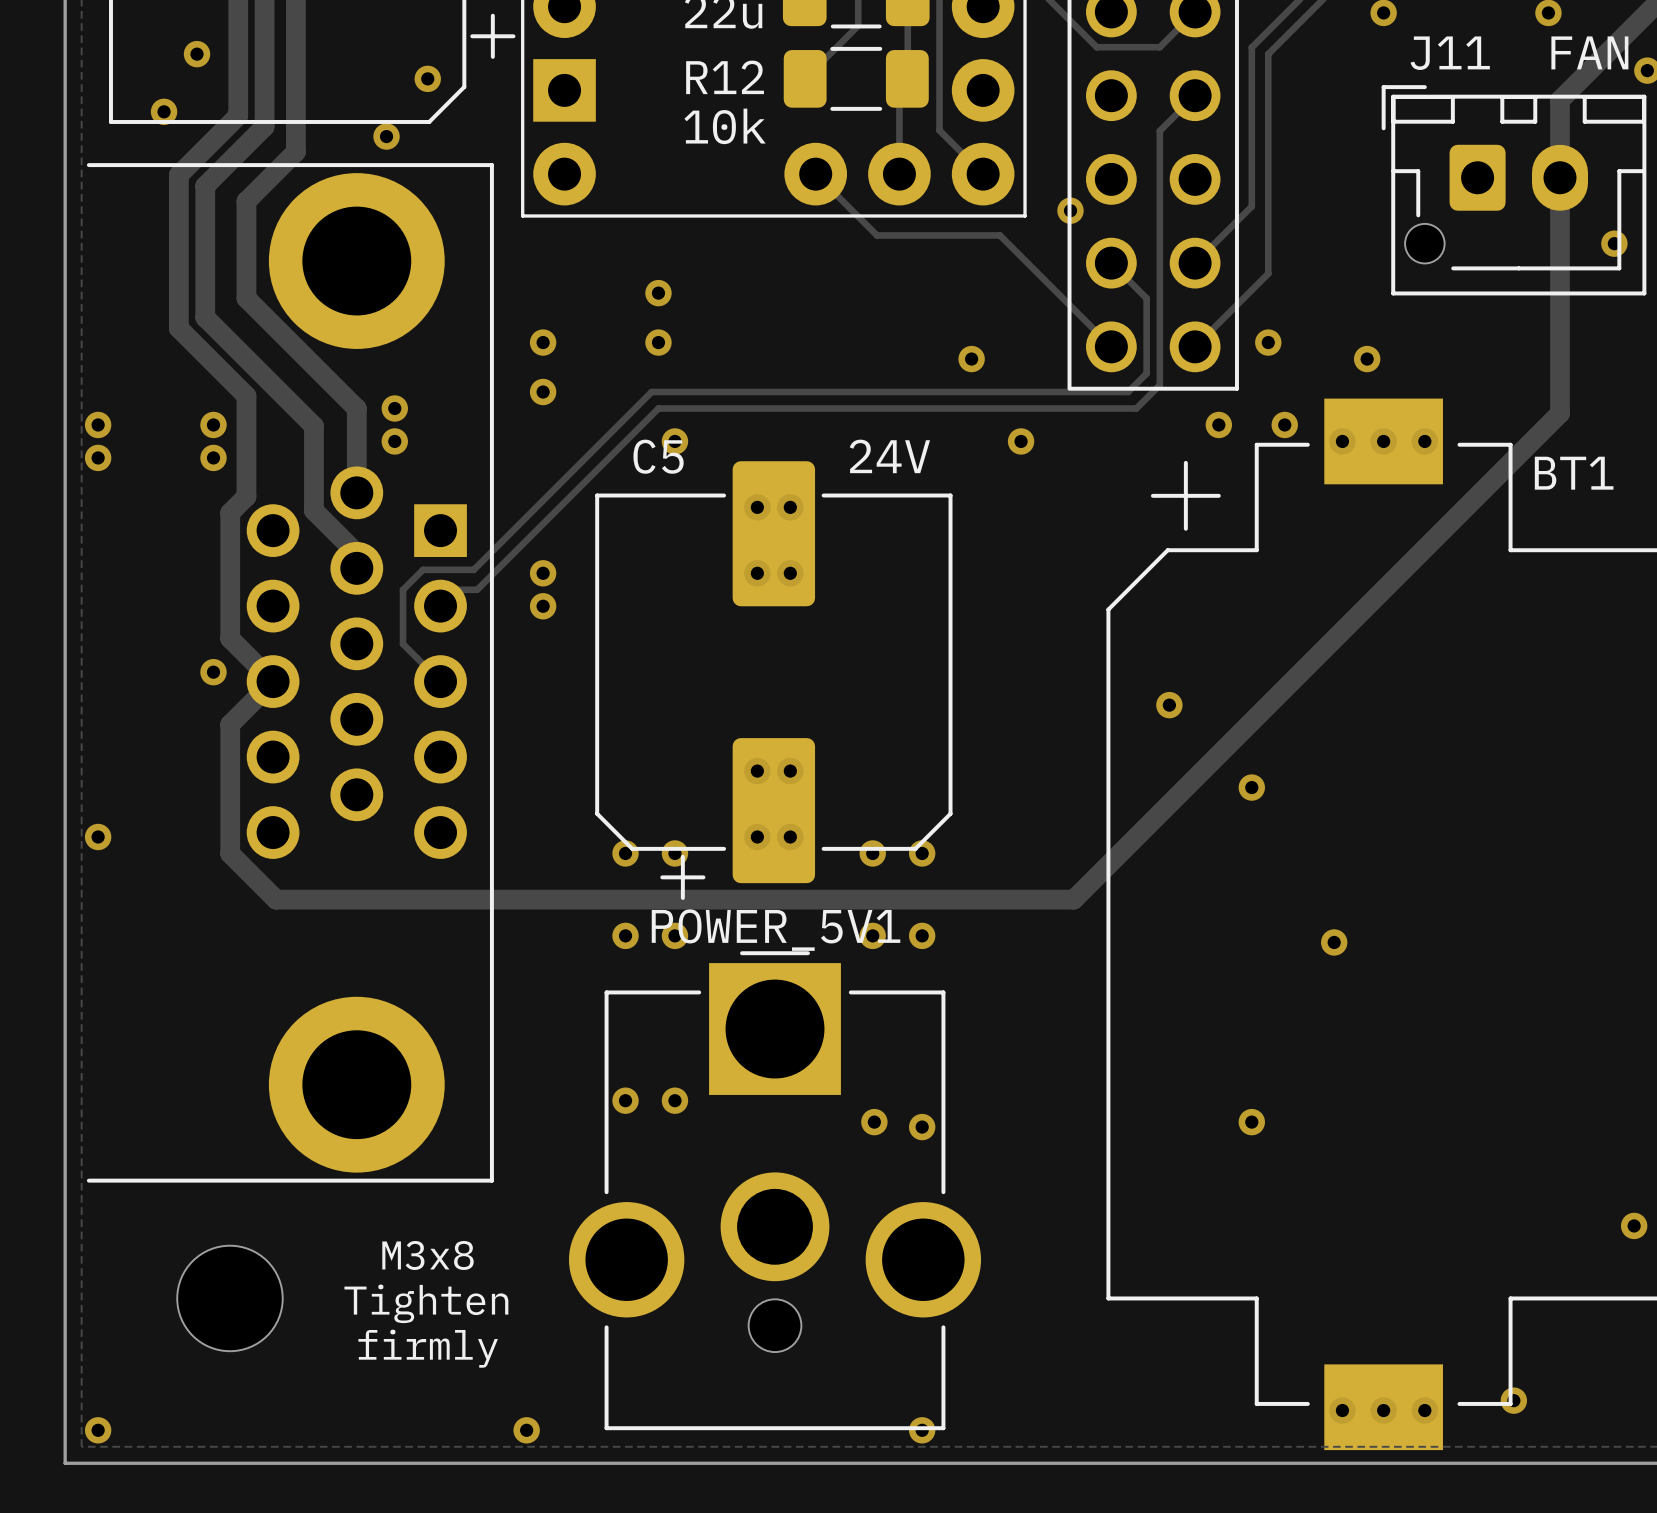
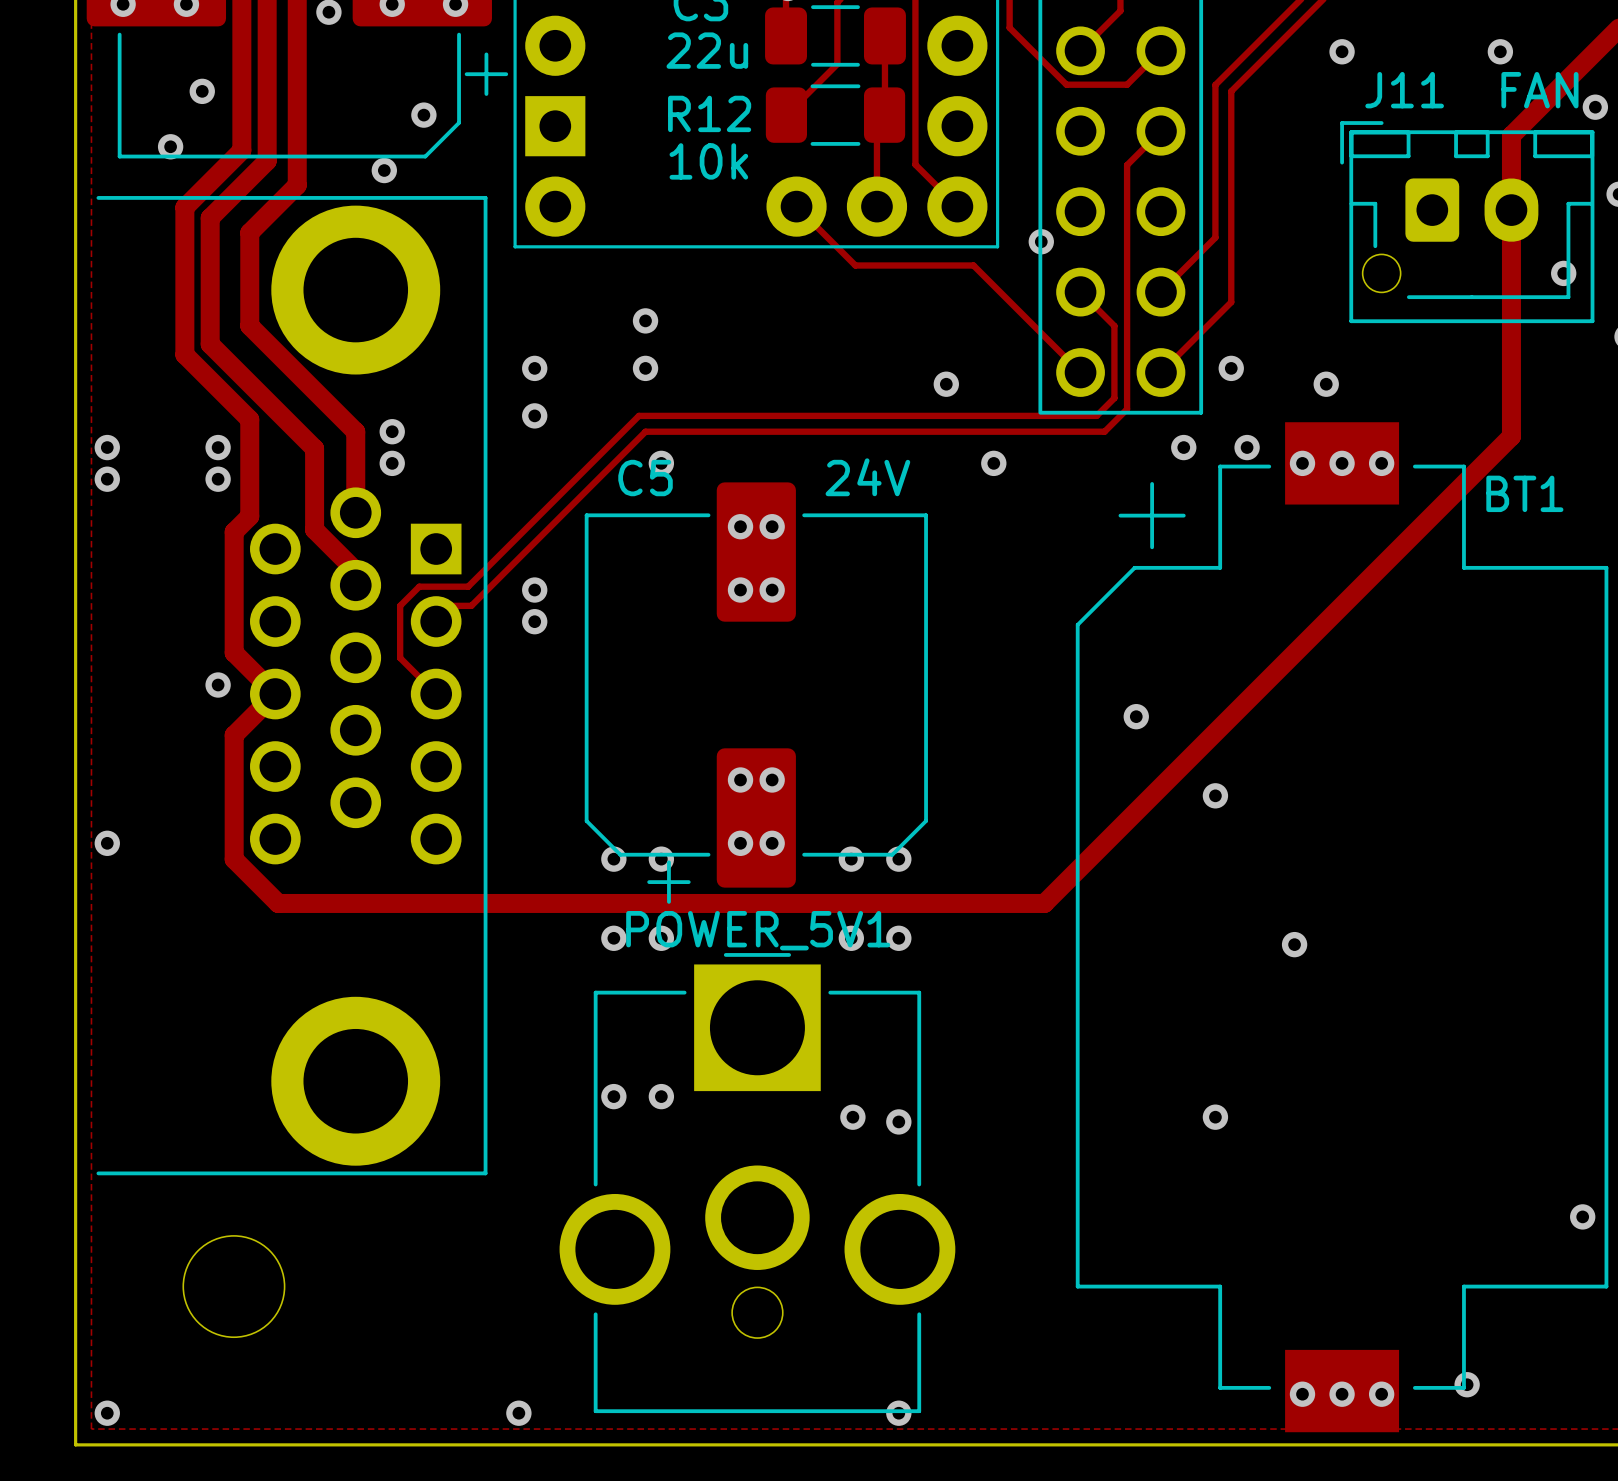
text: M3x8 (428, 1255) -> none
text: Tighten (426, 1303) -> none
text: firmly (428, 1348) -> none

